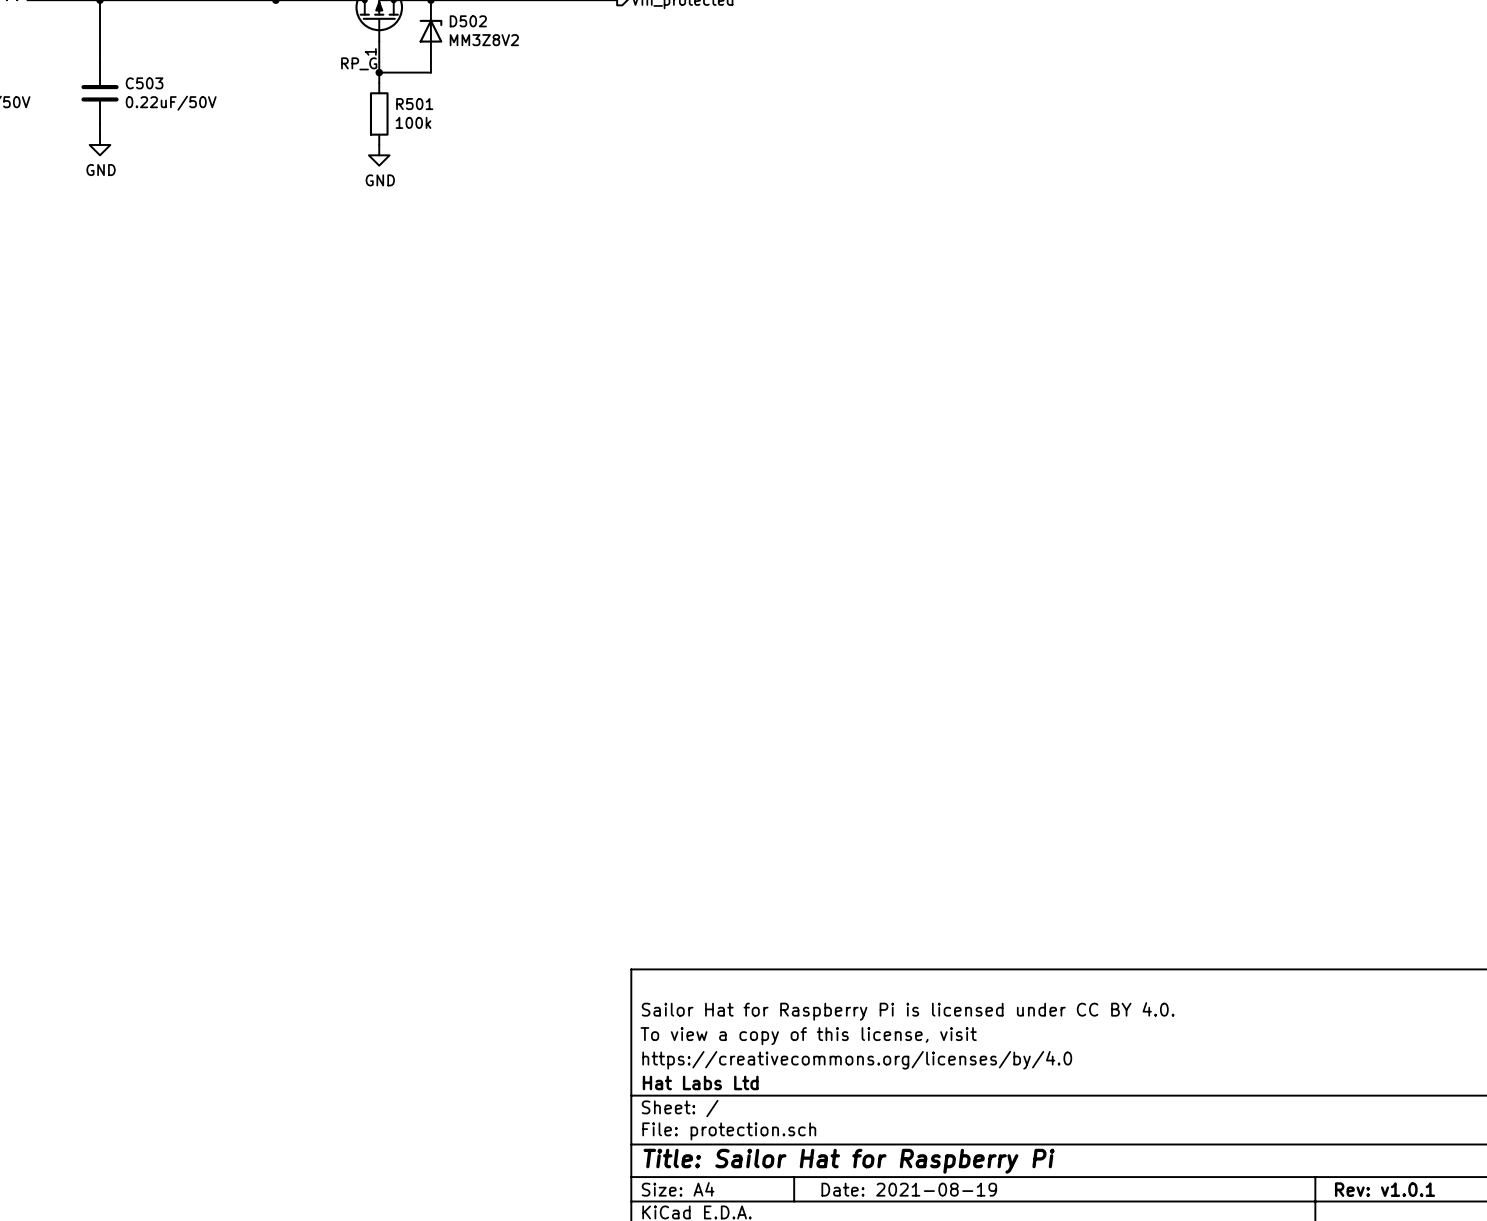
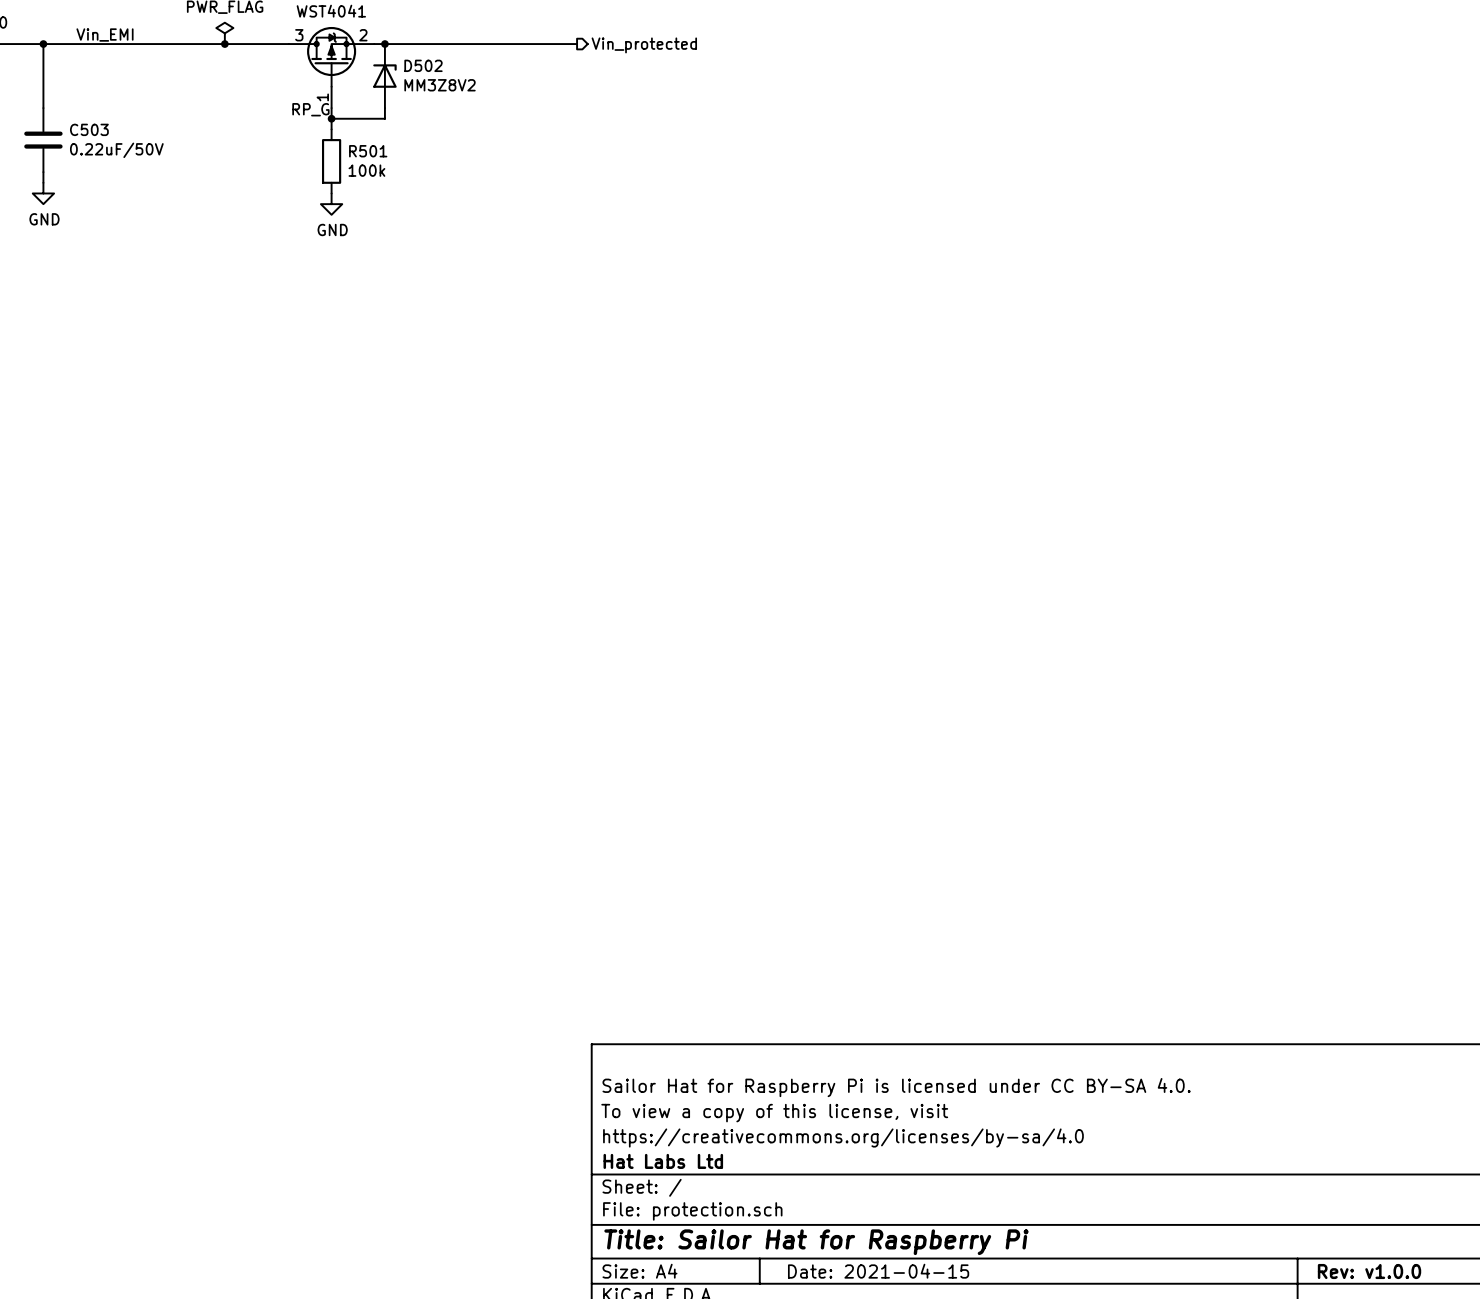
title block: Sailor Hat for Raspberry Pi is licensed under CC BY 4.0. (908, 1011) -> Sailor Hat for Raspberry Pi is licensed under CC BY-SA 4.0. (896, 1087)
title block: https://creativecommons.org/licenses/by/4.0 (857, 1060) -> https://creativecommons.org/licenses/by-sa/4.0 (843, 1138)
title block: Date: 2021-08-19 (909, 1189) -> Date: 2021-04-15 (878, 1271)
title block: Rev: v1.0.1 (1385, 1189) -> Rev: v1.0.0 (1369, 1271)

